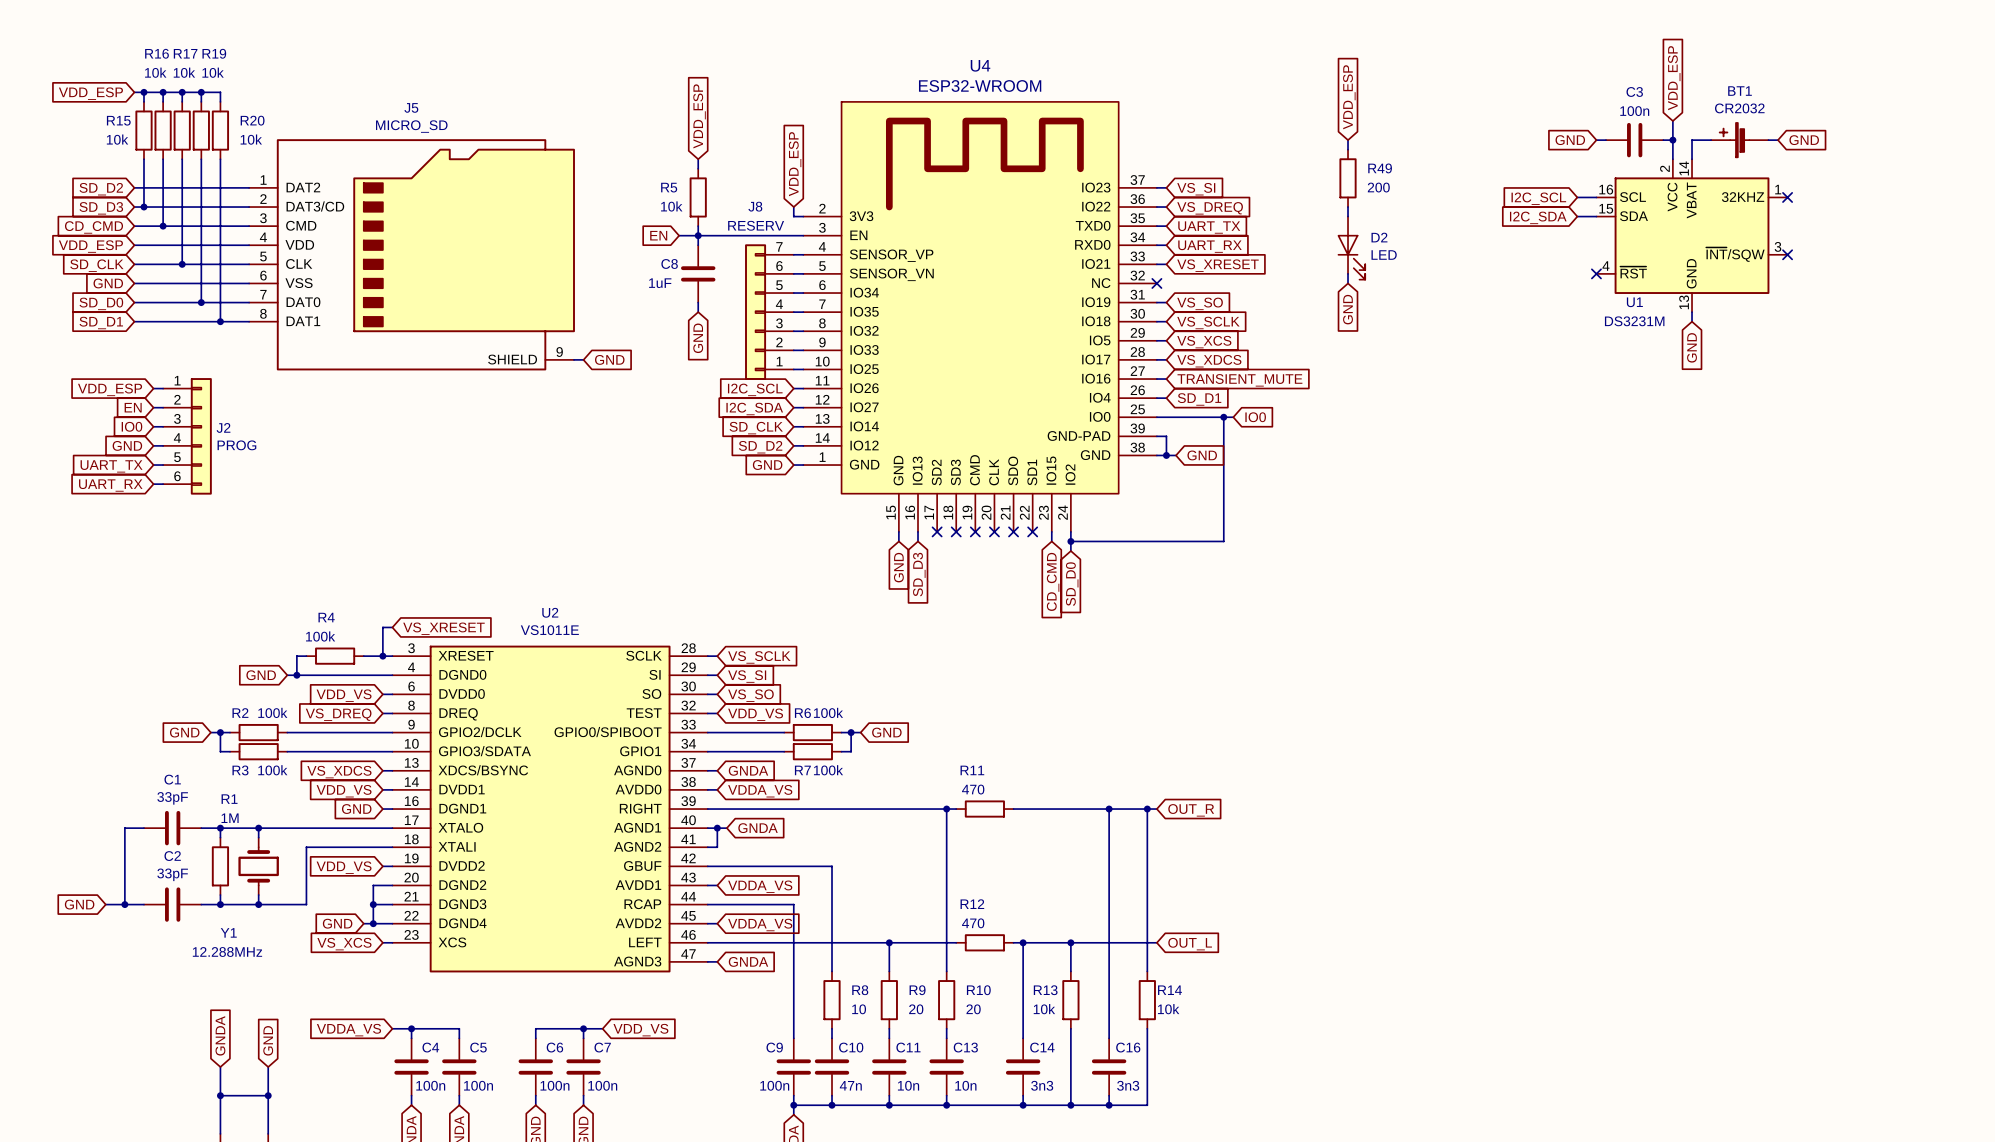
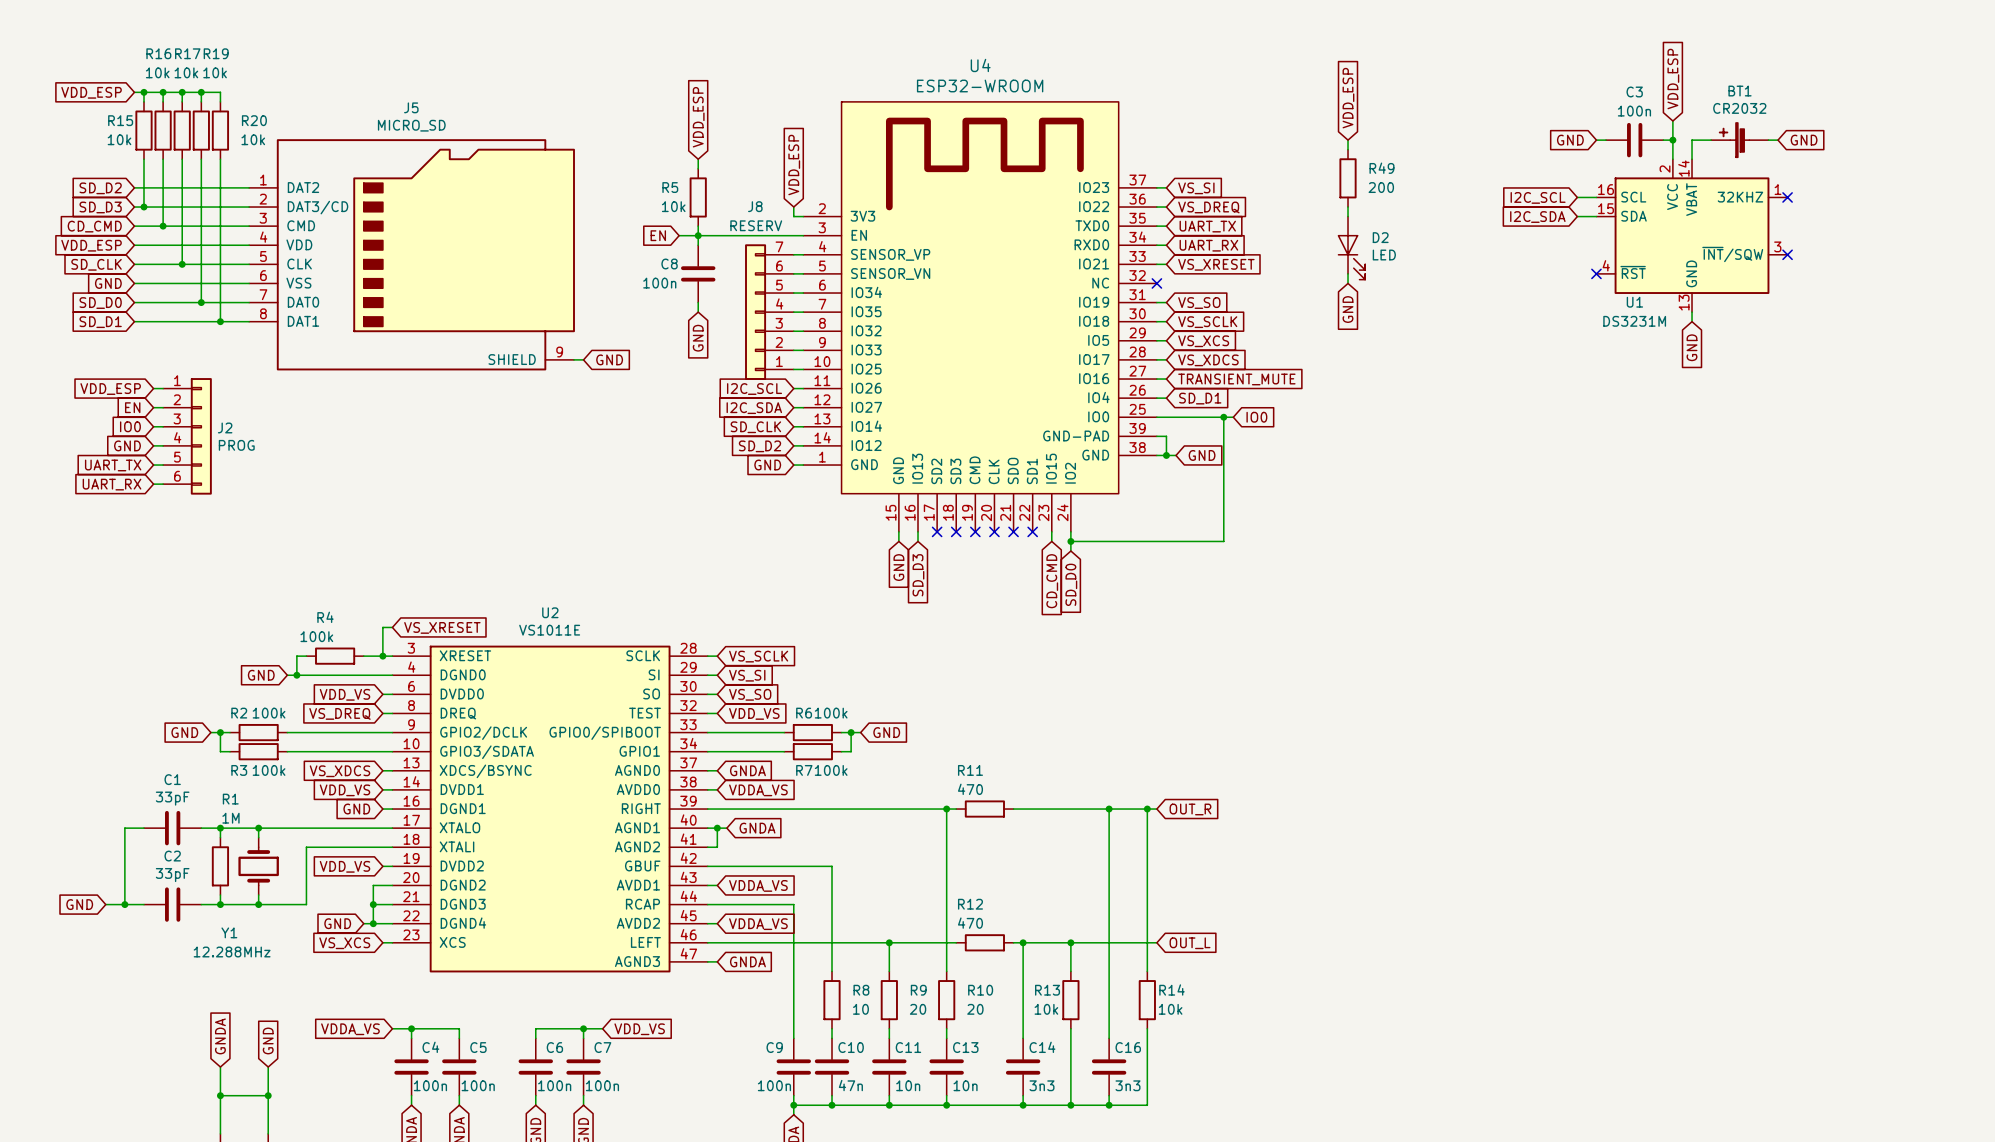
C8 value: 1uF (660, 283) -> 100n (659, 283)

